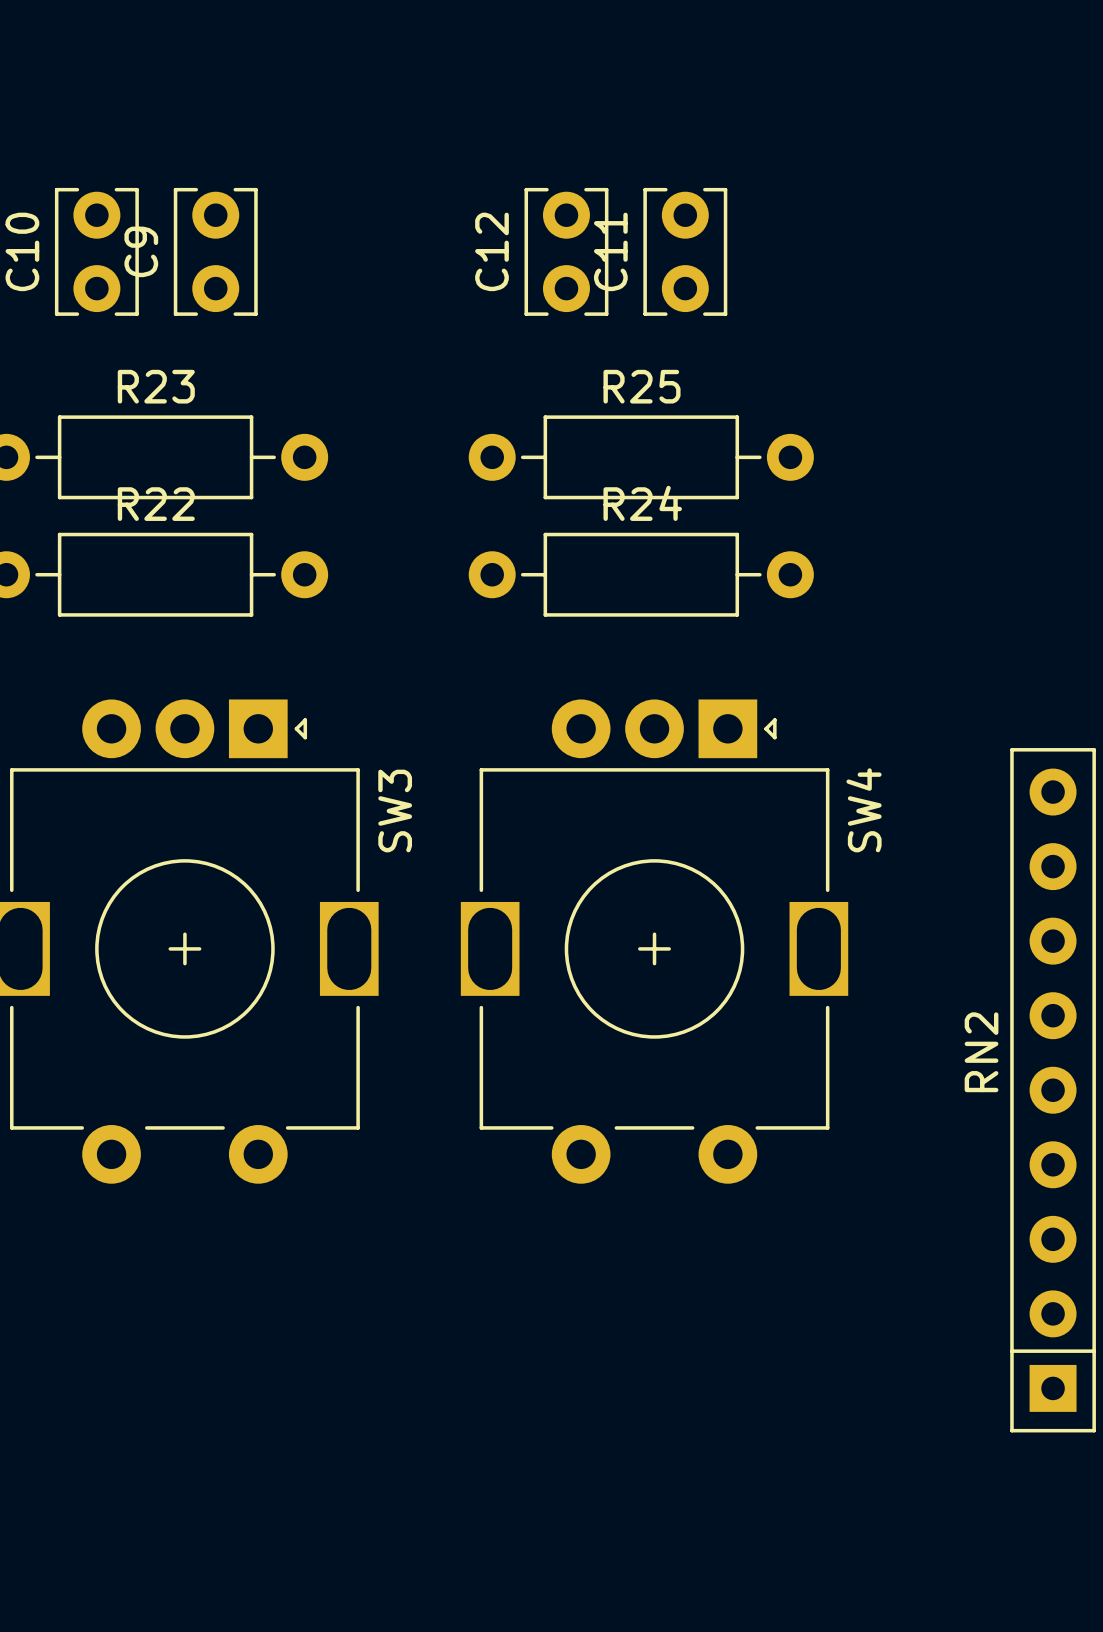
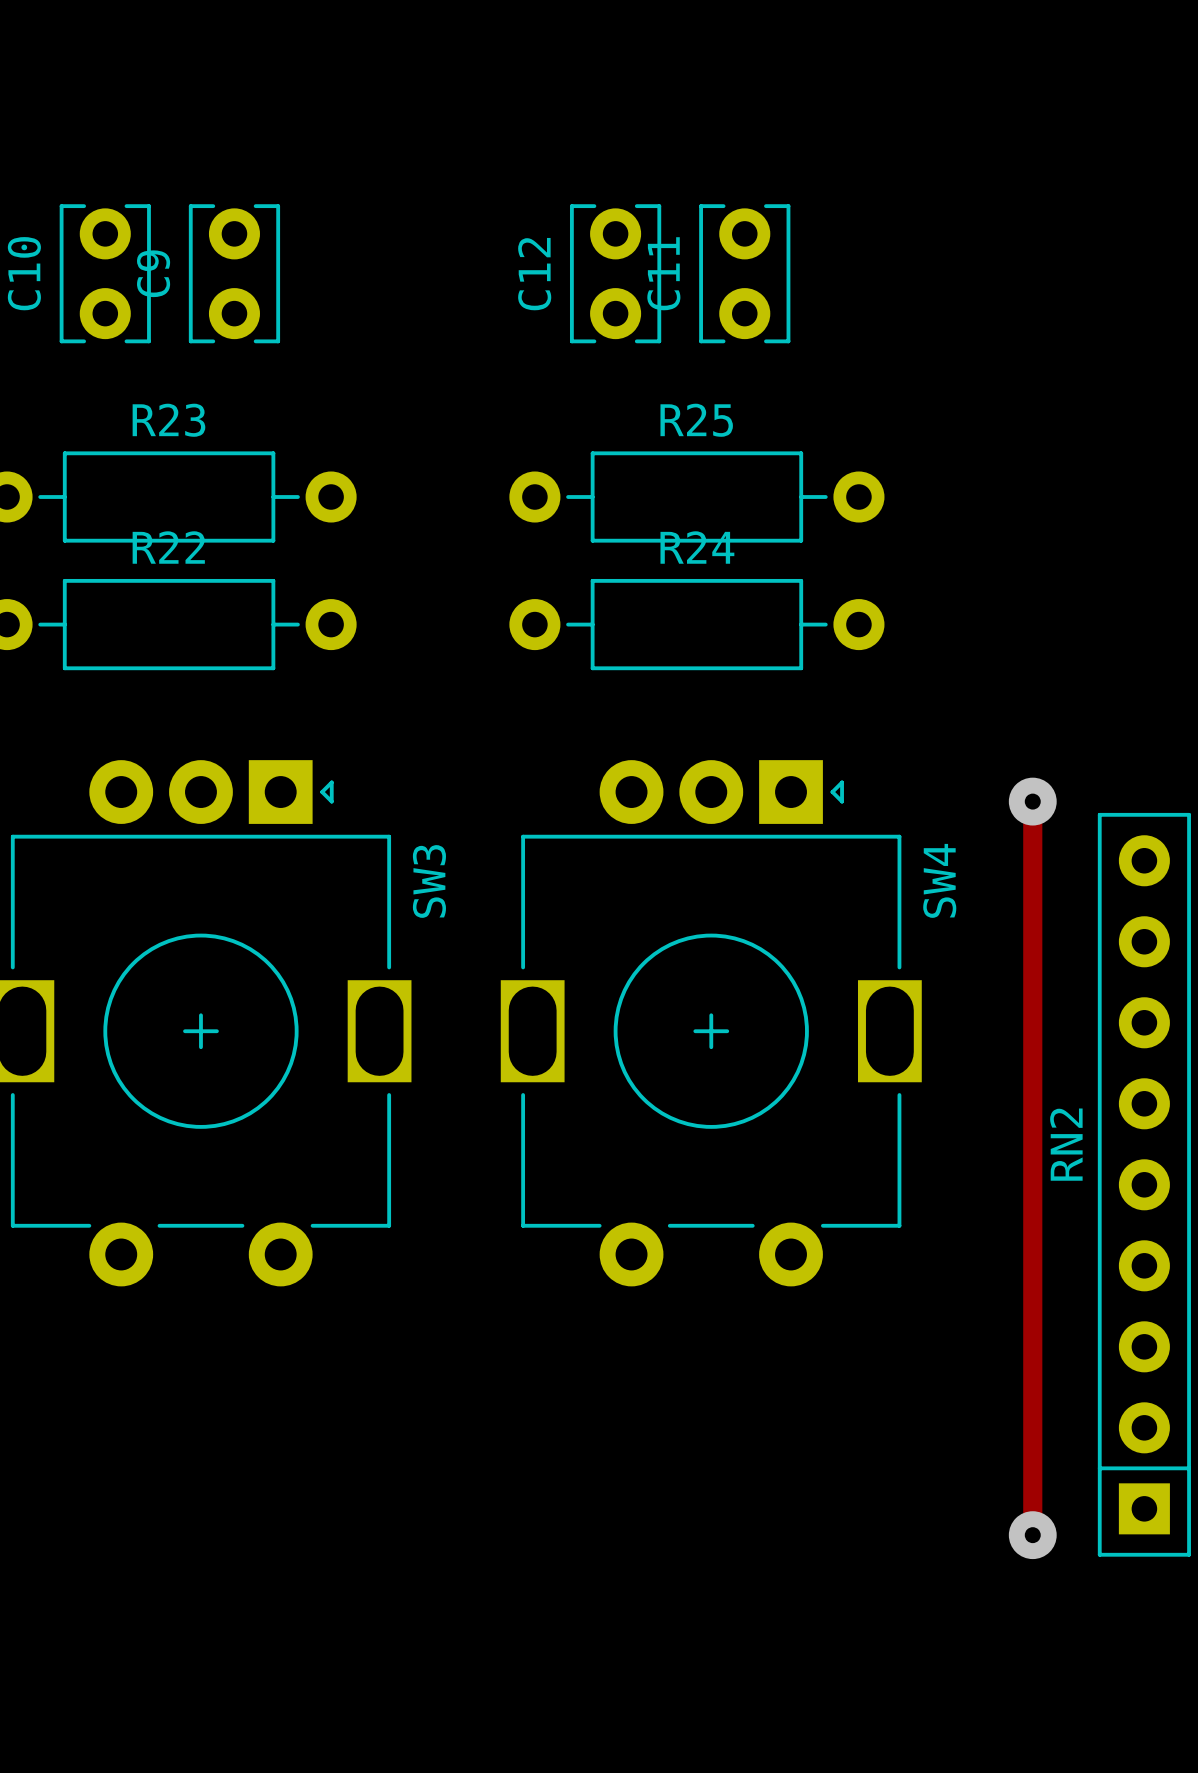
track: none -> (1032, 801) (1032, 1535)
via: none -> (1032, 801)
via: none -> (1032, 1535)

